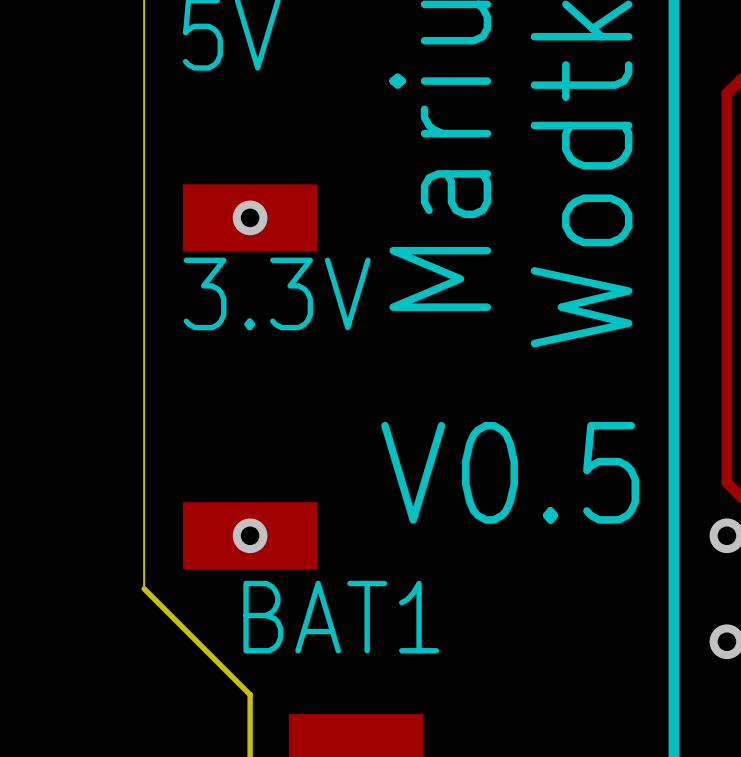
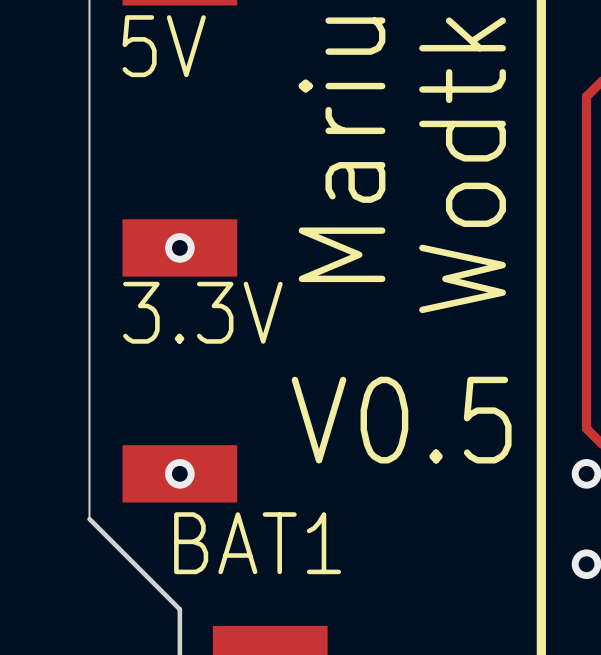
3.3V position: (250, 217) -> (179, 247)
via position: (250, 217) -> (179, 247)

